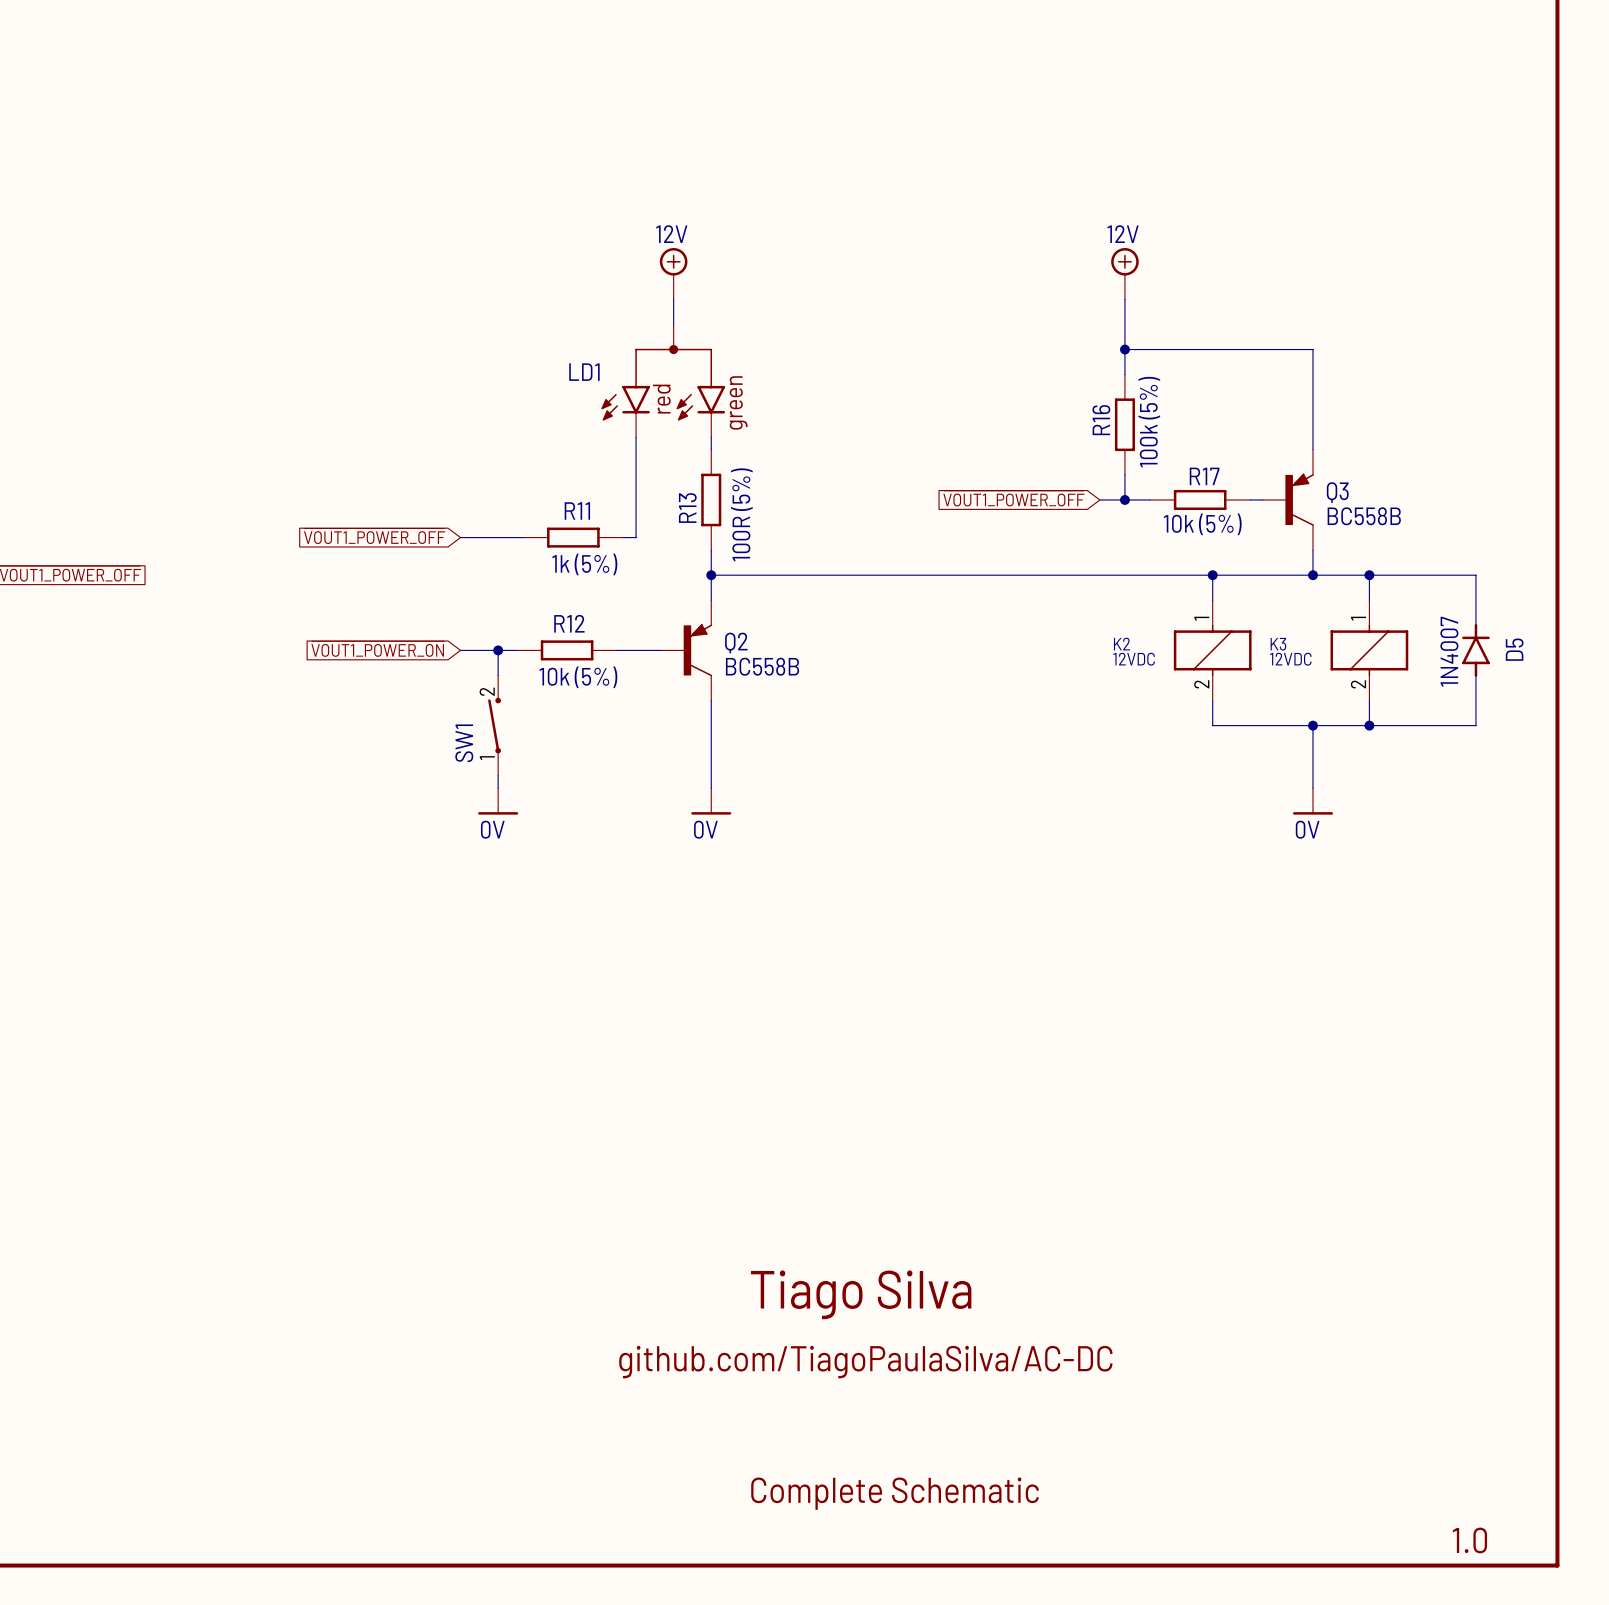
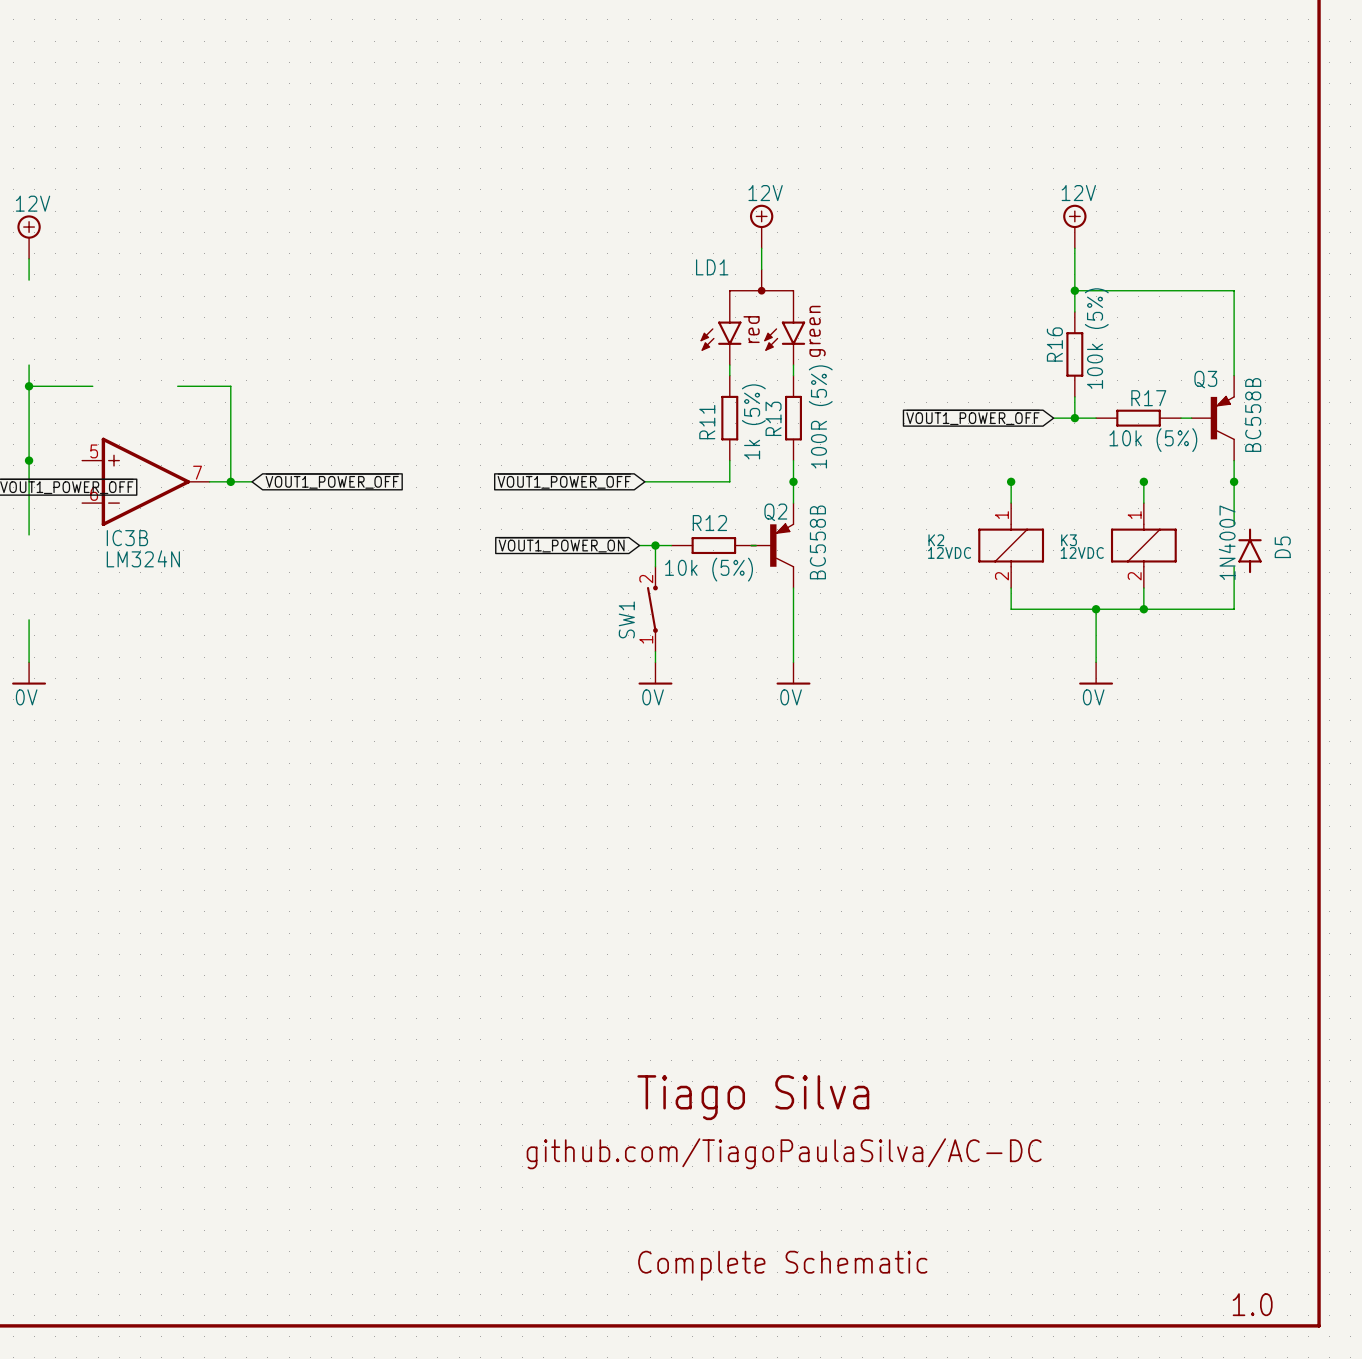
power symbol: none -> 12V (761, 226)
power symbol: none -> 12V (1074, 226)
power symbol: 12V (673, 273) -> none
power symbol: 12V (1124, 273) -> none
power symbol: none -> 12V (29, 237)
wire: (673, 299) (673, 324) -> (761, 248) (761, 269)
wire: (1124, 299) (1124, 374) -> (1074, 248) (1074, 311)
wire: none -> (29, 258) (29, 280)
junction: none -> (1074, 290)
wire: (1124, 349) (1312, 349) (1312, 449) -> (1074, 290) (1234, 290) (1234, 375)
junction: (1124, 349) -> none
LD1 name position: LD1 (584, 372) -> LD1 (712, 267)
LD1 position: (663, 380) -> (752, 317)
R16 position: (1124, 424) -> (1074, 354)
wire: none -> (29, 365) (29, 534)
wire: none -> (729, 365) (729, 375)
wire: (636, 437) (636, 537) (623, 537) -> none
wire: (711, 437) (711, 449) -> (793, 365) (793, 375)
wire: none -> (29, 386) (92, 386)
junction: none -> (29, 386)
wire: none -> (177, 386) (230, 386) (230, 481)
wire: (1124, 474) (1124, 499) -> (1074, 396) (1074, 418)
Q3 name position: Q3 (1337, 492) -> Q3 (1205, 379)
junction: none -> (1074, 418)
global label position: ~{VOUT1_POWER_OFF} (1013, 498) -> ~{VOUT1_POWER_OFF} (973, 417)
R13 position: (711, 499) -> (793, 418)
wire: (1099, 499) (1150, 499) -> (1053, 418) (1096, 418)
junction: (1124, 499) -> none
R17 position: (1200, 499) -> (1138, 418)
wire: (1250, 499) (1262, 499) -> (1181, 418) (1191, 418)
Q3 position: (1288, 499) -> (1213, 418)
R11 name position: R11 (577, 511) -> R11 (707, 422)
Q3 value rotation: 0° (1364, 516) -> 90° counterclockwise (1253, 415)
global label: ~{VOUT1_POWER_OFF} (374, 536) -> none
wire: (460, 537) (523, 537) -> none
R11 rotation: 0° (573, 537) -> 90° clockwise (729, 418)
R11 position: (573, 537) -> (729, 418)
junction: none -> (29, 460)
wire: none -> (729, 460) (729, 481) (644, 481)
wire: none -> (1234, 460) (1234, 524)
wire: (711, 550) (711, 600) -> (793, 460) (793, 503)
wire: (1312, 550) (1312, 575) -> none
R11 value position: 1k (5%) (584, 564) -> 1k (5%) (753, 421)
global label: none -> ~{VOUT1_POWER_OFF} (332, 481)
global label: none -> ~{VOUT1_POWER_OFF} (564, 481)
IC3B: none -> LM324N (145, 481)
wire: none -> (209, 481) (252, 481)
junction: none -> (230, 481)
junction: none -> (793, 481)
junction: none -> (1143, 481)
junction: none -> (1234, 481)
wire: (711, 575) (1475, 575) (1475, 625) -> none
junction: (711, 575) -> none
wire: (1212, 575) (1212, 600) -> (1011, 481) (1011, 503)
junction position: (1212, 575) -> (1011, 481)
junction: (1312, 575) -> none
wire: (1369, 575) (1369, 600) -> (1143, 481) (1143, 503)
junction: (1369, 575) -> none
global label: none -> ~{VOUT1_POWER_ON} (562, 544)
Q2 name position: Q2 (736, 642) -> Q2 (775, 512)
wire: none -> (639, 545) (671, 545)
wire: none -> (655, 545) (655, 566)
junction: none -> (655, 545)
wire: none -> (751, 545) (756, 545)
global label: ~{VOUT1_POWER_ON} (377, 649) -> none
wire: (460, 650) (516, 650) -> none
wire: (498, 650) (498, 675) -> none
junction: (498, 650) -> none
R12 position: (567, 650) -> (713, 545)
wire: (617, 650) (661, 650) -> none
Q2 position: (686, 650) -> (772, 545)
K2 position: (1212, 650) -> (1011, 545)
K3 position: (1369, 650) -> (1143, 545)
Q2 value rotation: 0° (762, 666) -> 90° counterclockwise (817, 542)
wire: (1475, 675) (1475, 725) (1212, 725) (1212, 700) -> (1234, 566) (1234, 609) (1011, 609) (1011, 588)
wire: (711, 700) (711, 788) -> (793, 588) (793, 662)
wire: (1369, 700) (1369, 725) -> (1143, 588) (1143, 609)
junction: none -> (1096, 609)
junction: none -> (1143, 609)
SW1 position: (494, 725) -> (652, 609)
wire: (1312, 725) (1312, 788) -> (1096, 609) (1096, 662)
junction: (1312, 725) -> none
junction: (1369, 725) -> none
wire: none -> (29, 619) (29, 662)
wire: none -> (655, 651) (655, 662)
wire: (498, 775) (498, 788) -> none
power symbol: none -> 0V (29, 673)
power symbol: none -> 0V (793, 673)
power symbol: 0V (498, 801) -> none
power symbol position: 0V (711, 801) -> 0V (655, 673)
power symbol position: 0V (1312, 801) -> 0V (1096, 673)

